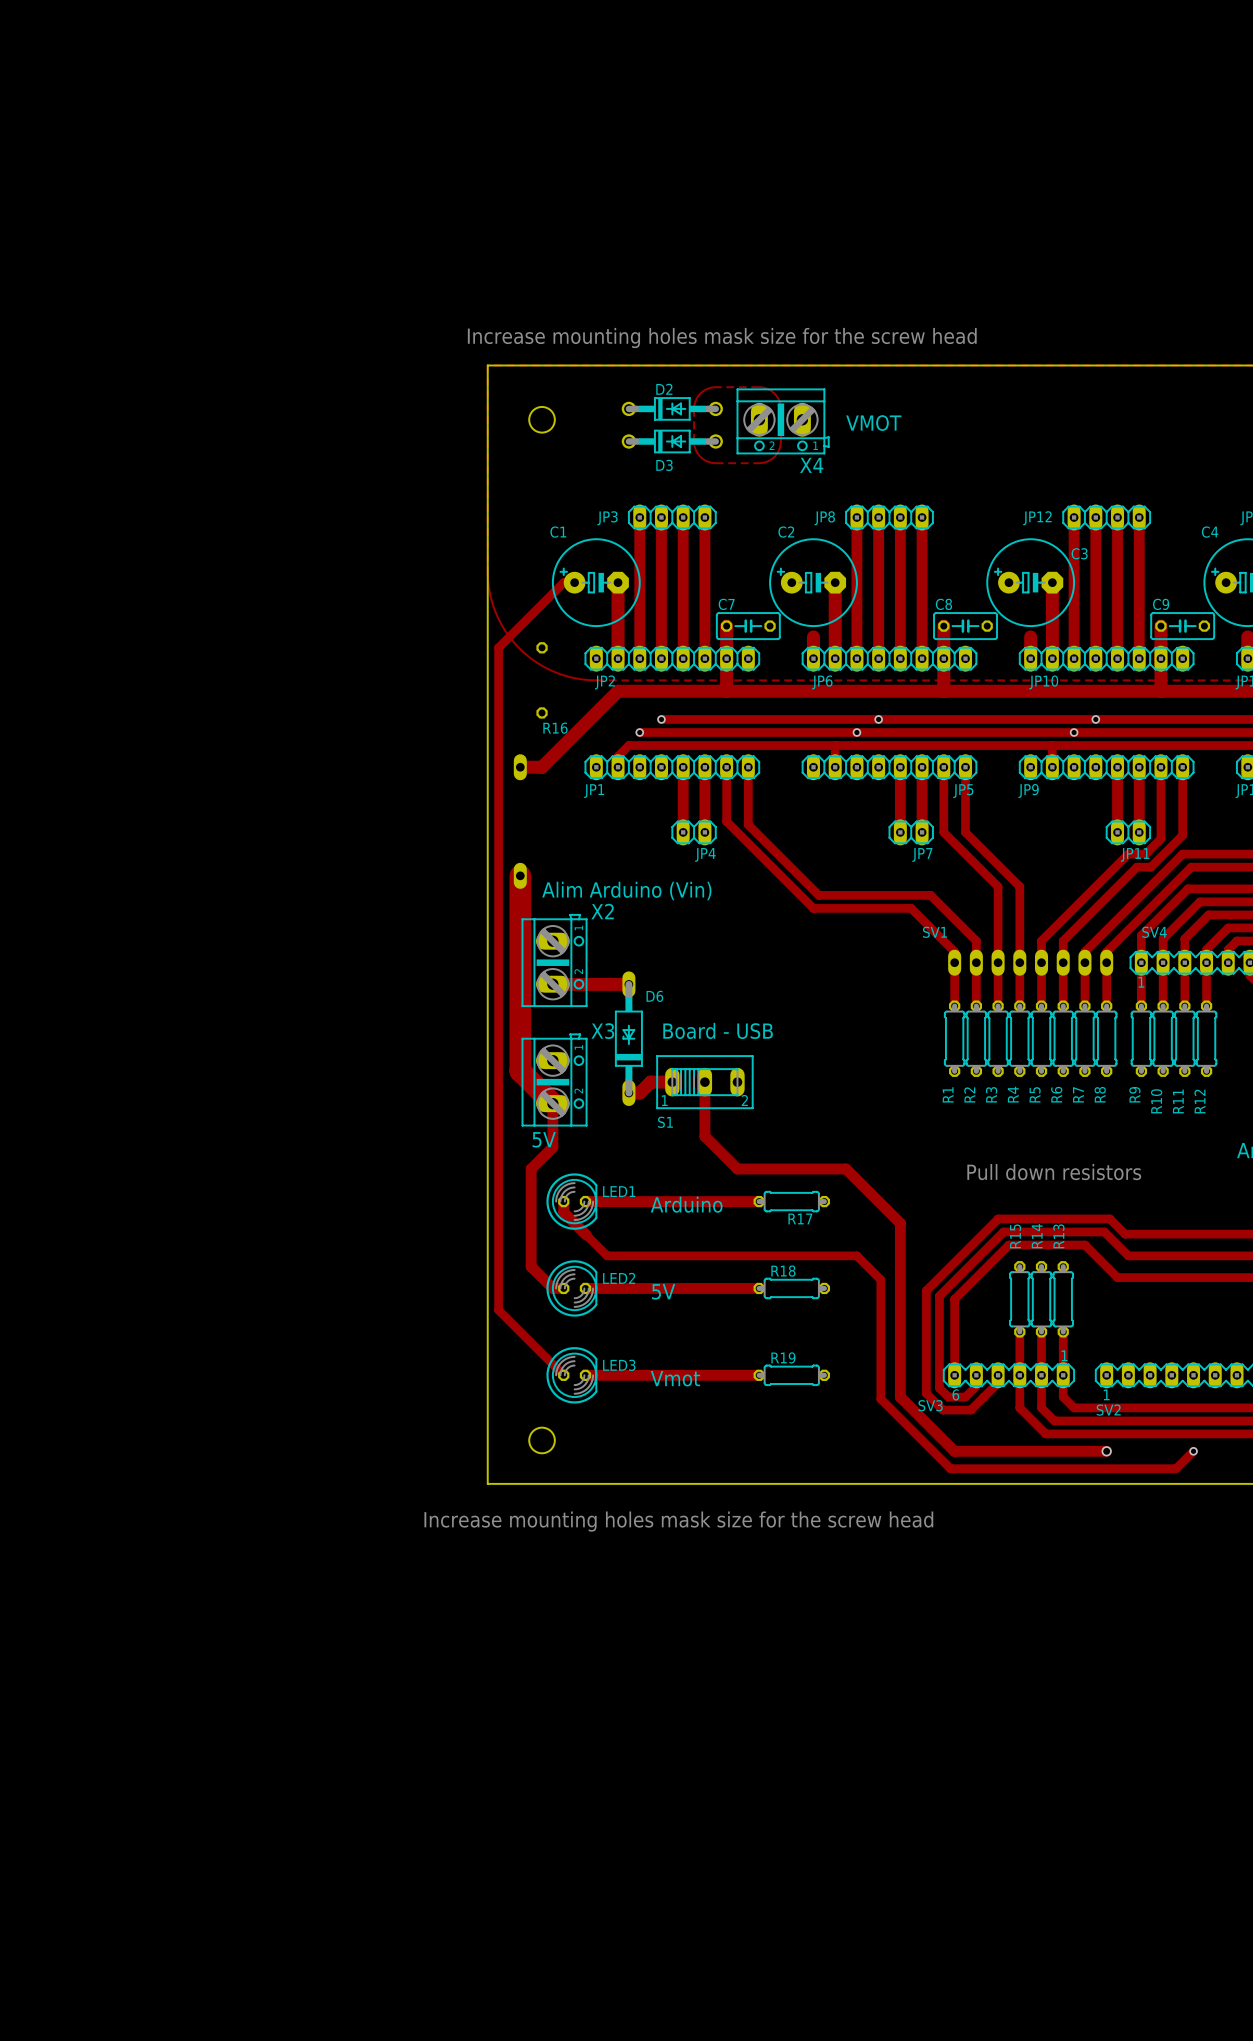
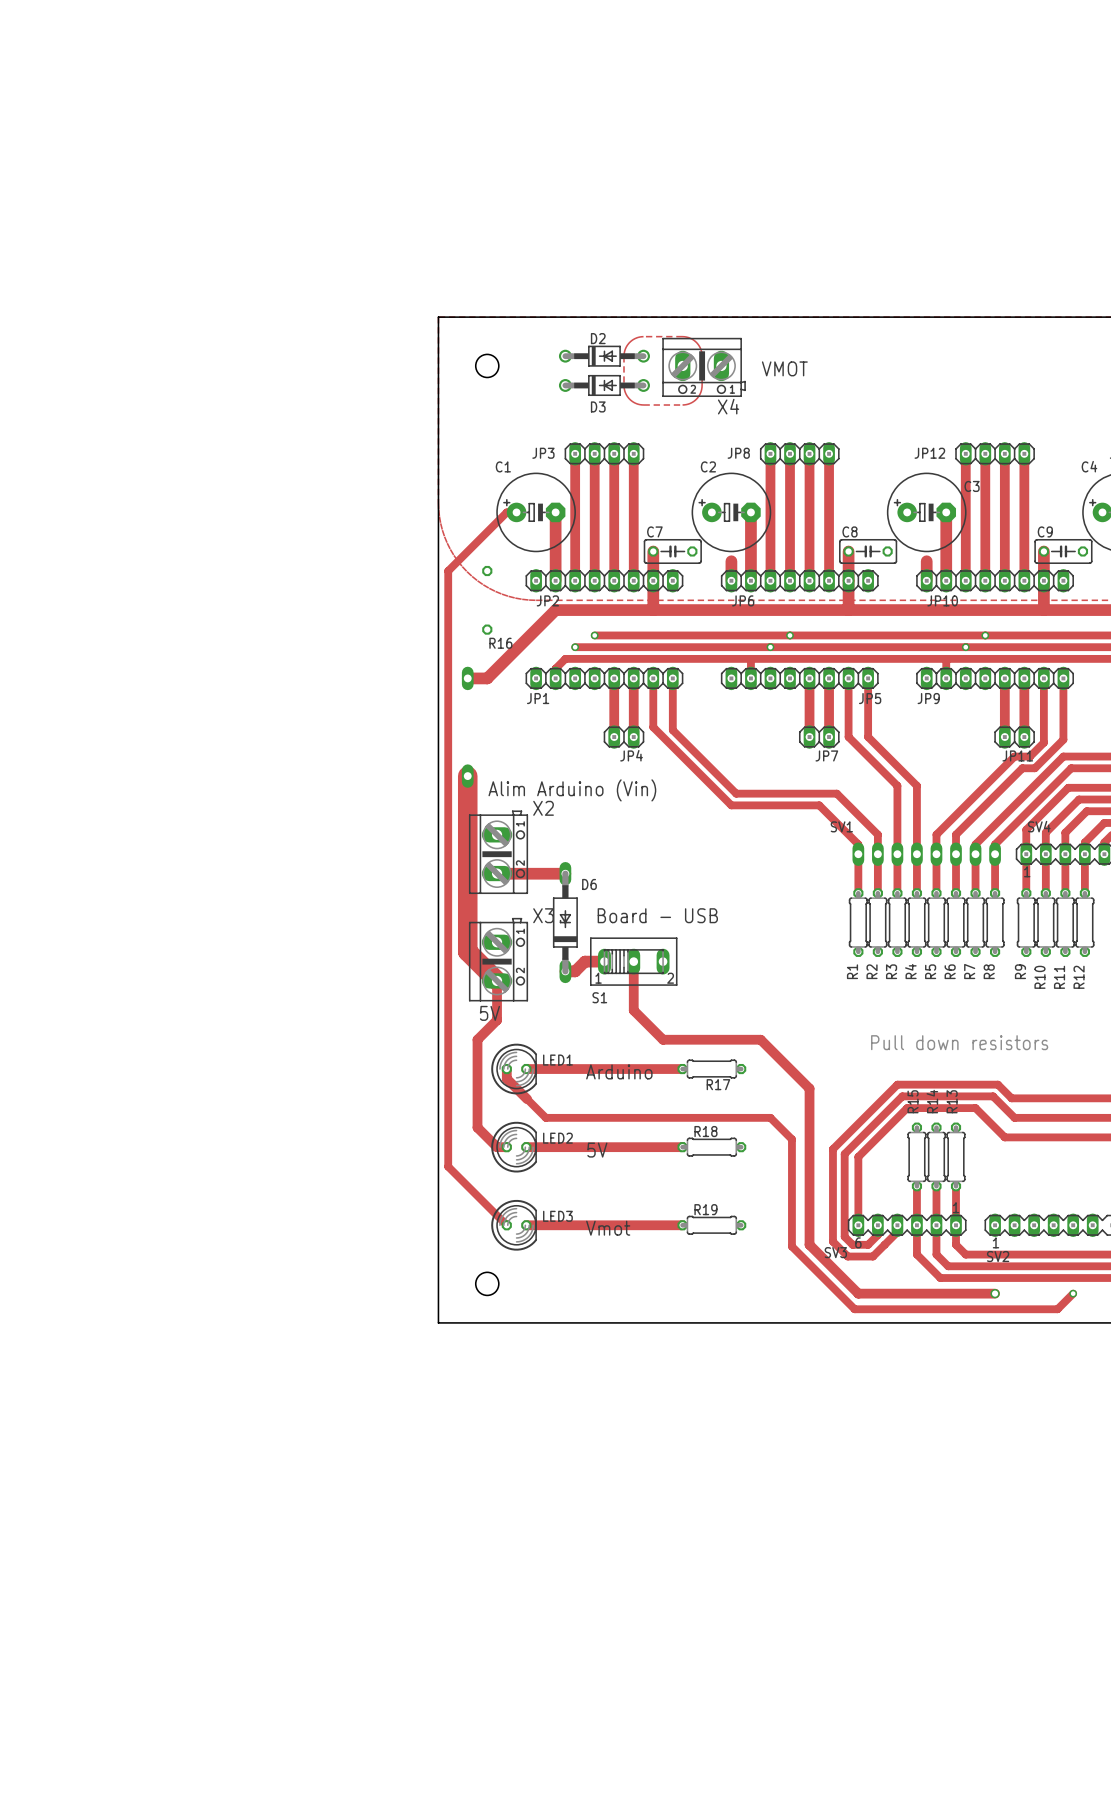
text: Increase mounting holes mask size for the screw head (722, 338) -> none
text: Increase mounting holes mask size for the screw head (678, 1521) -> none

